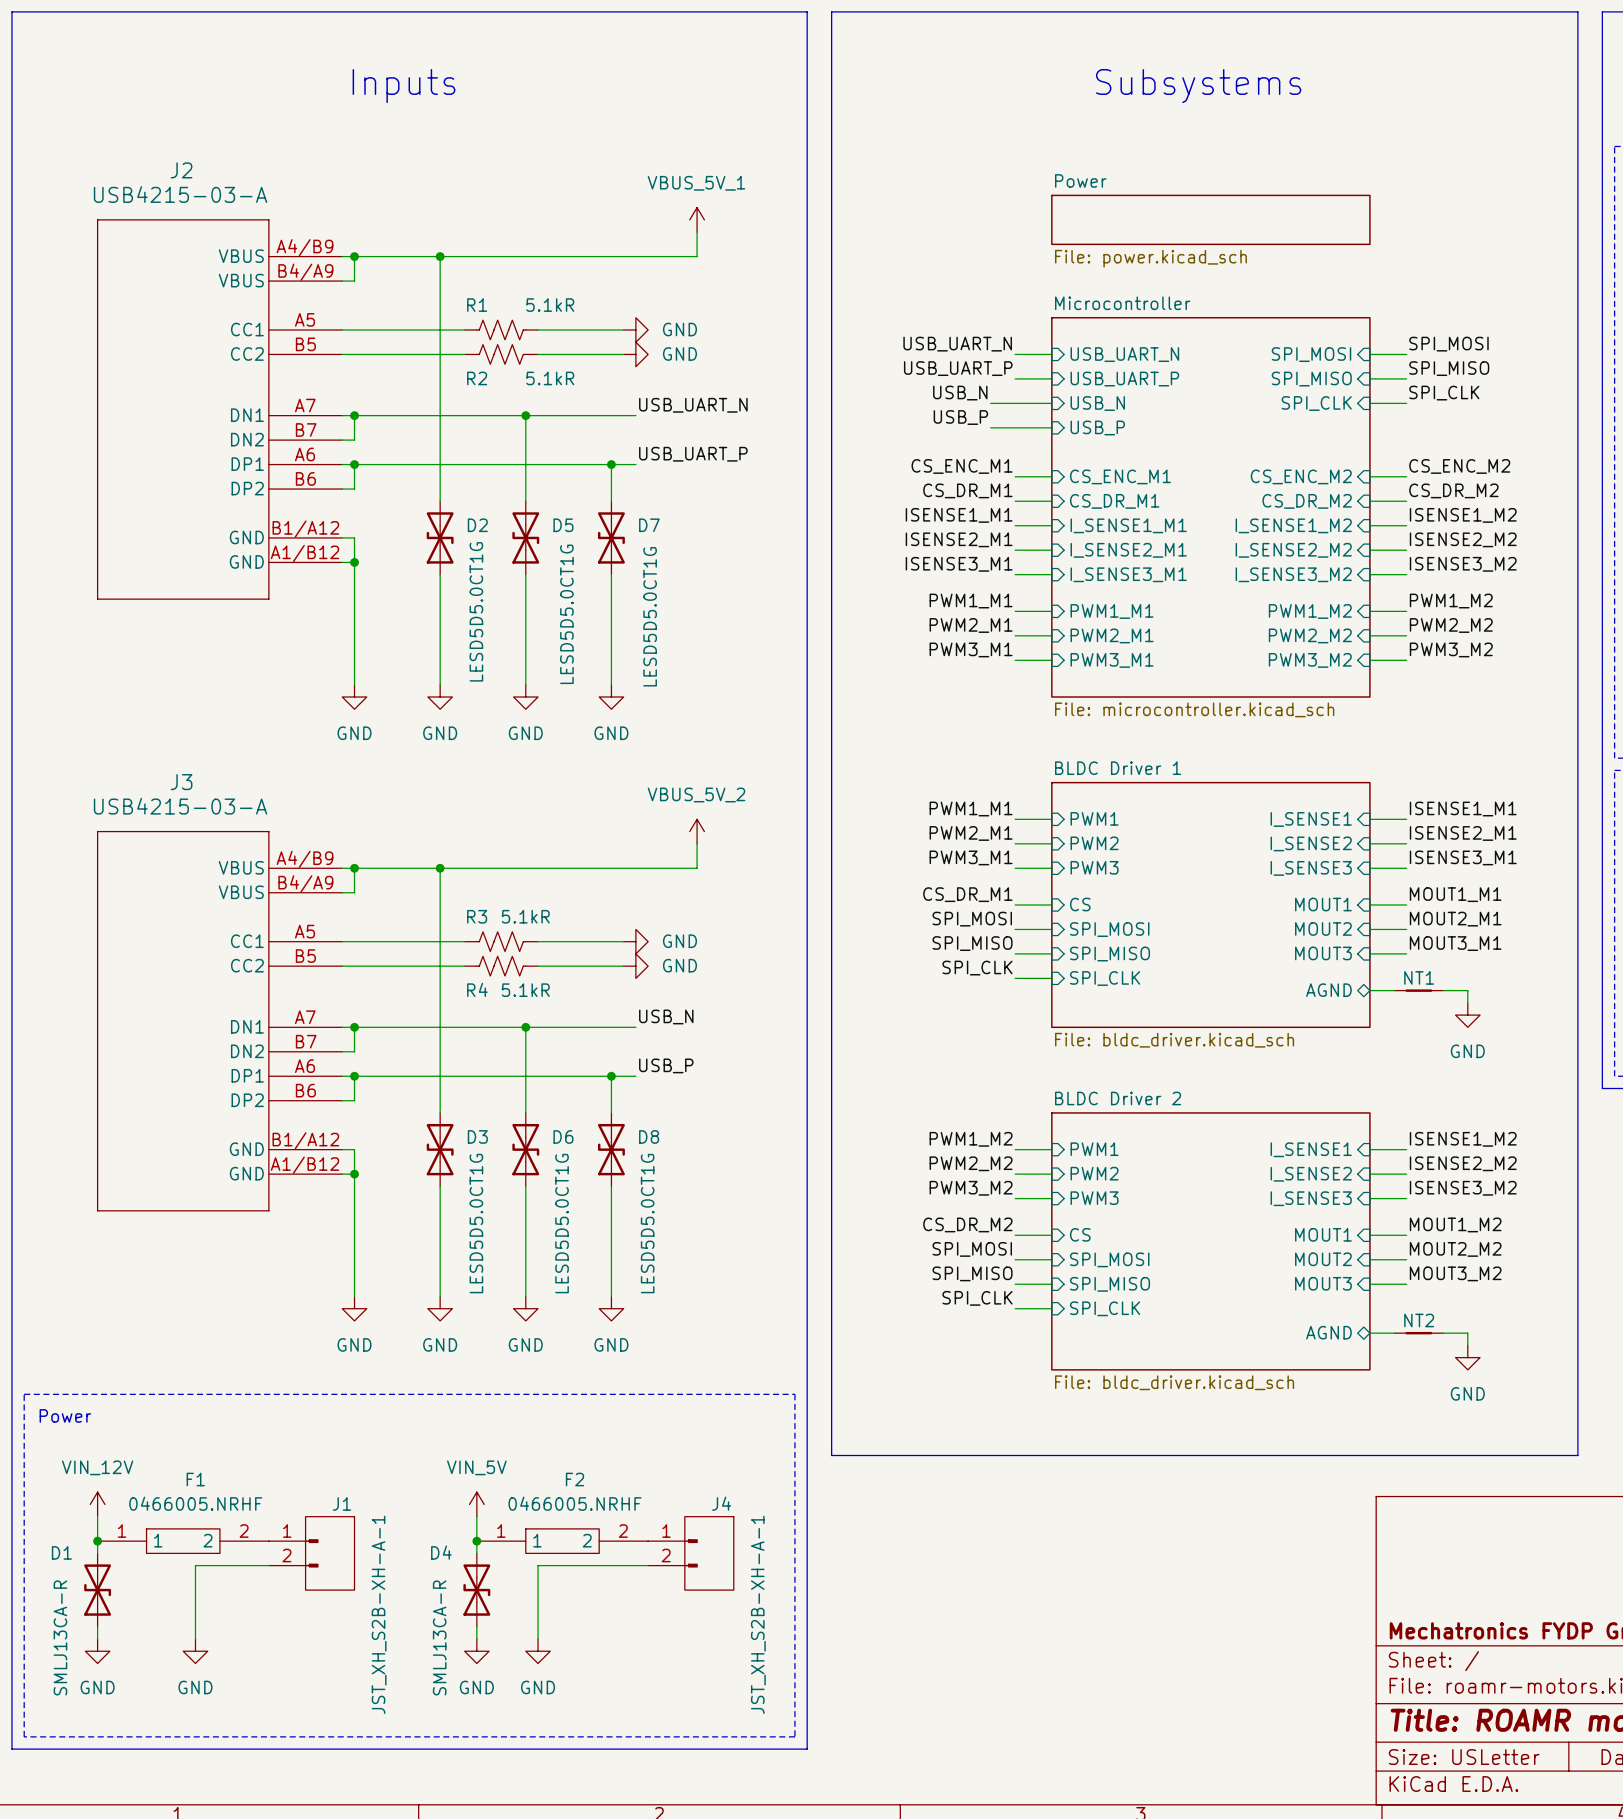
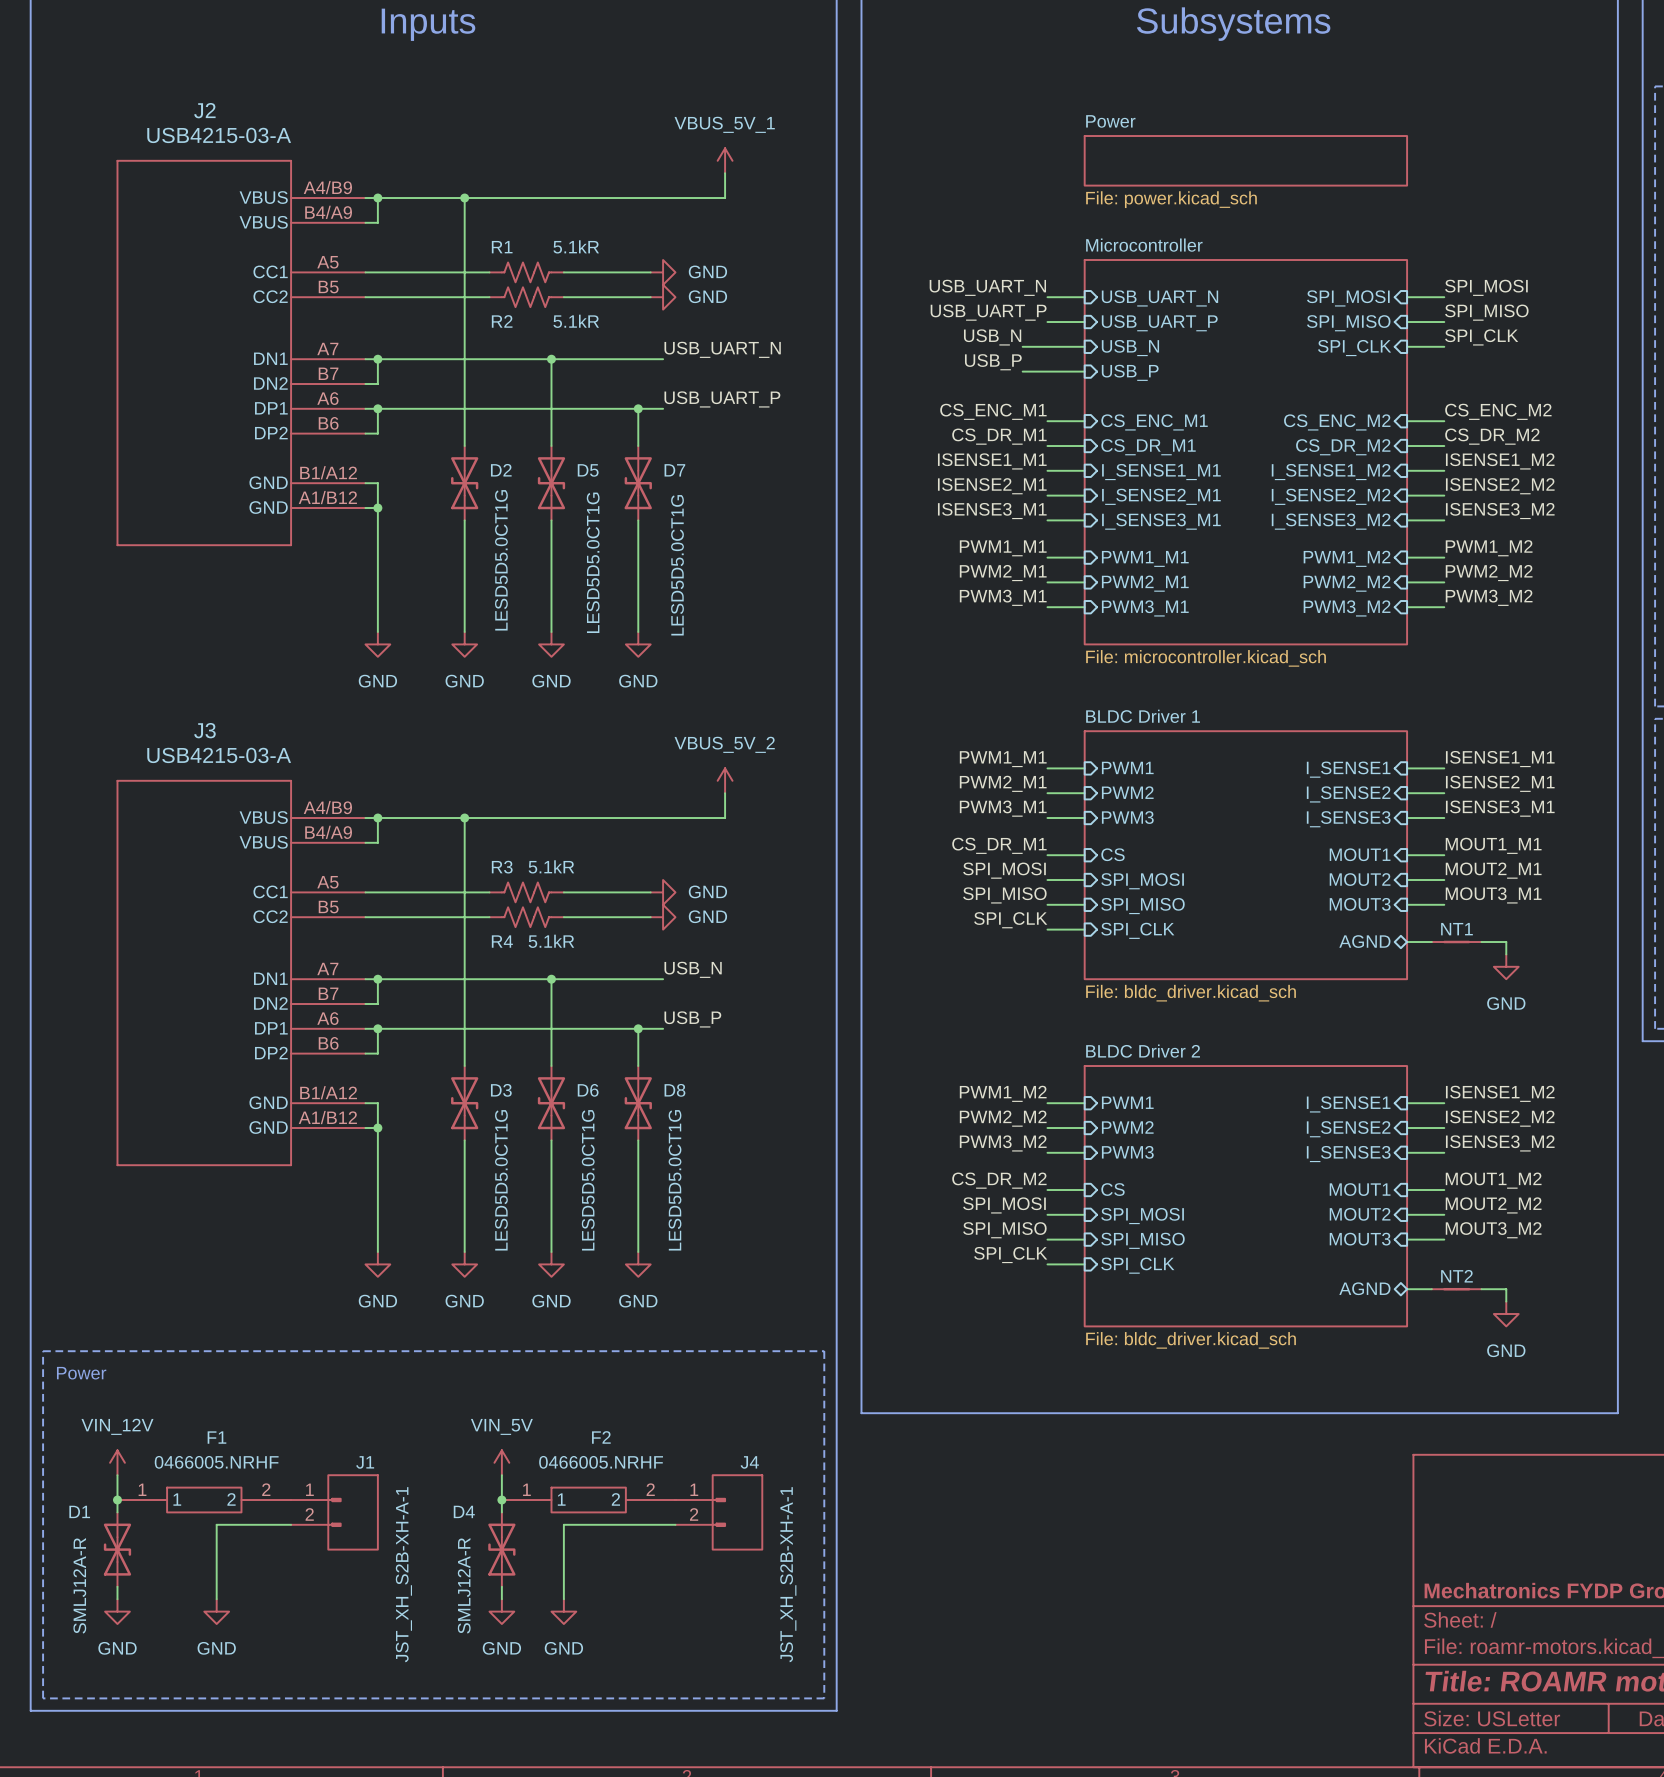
D1 value: SMLJ13CA-R (60, 1637) -> SMLJ12A-R (79, 1585)
D4 value: SMLJ13CA-R (439, 1637) -> SMLJ12A-R (464, 1585)

